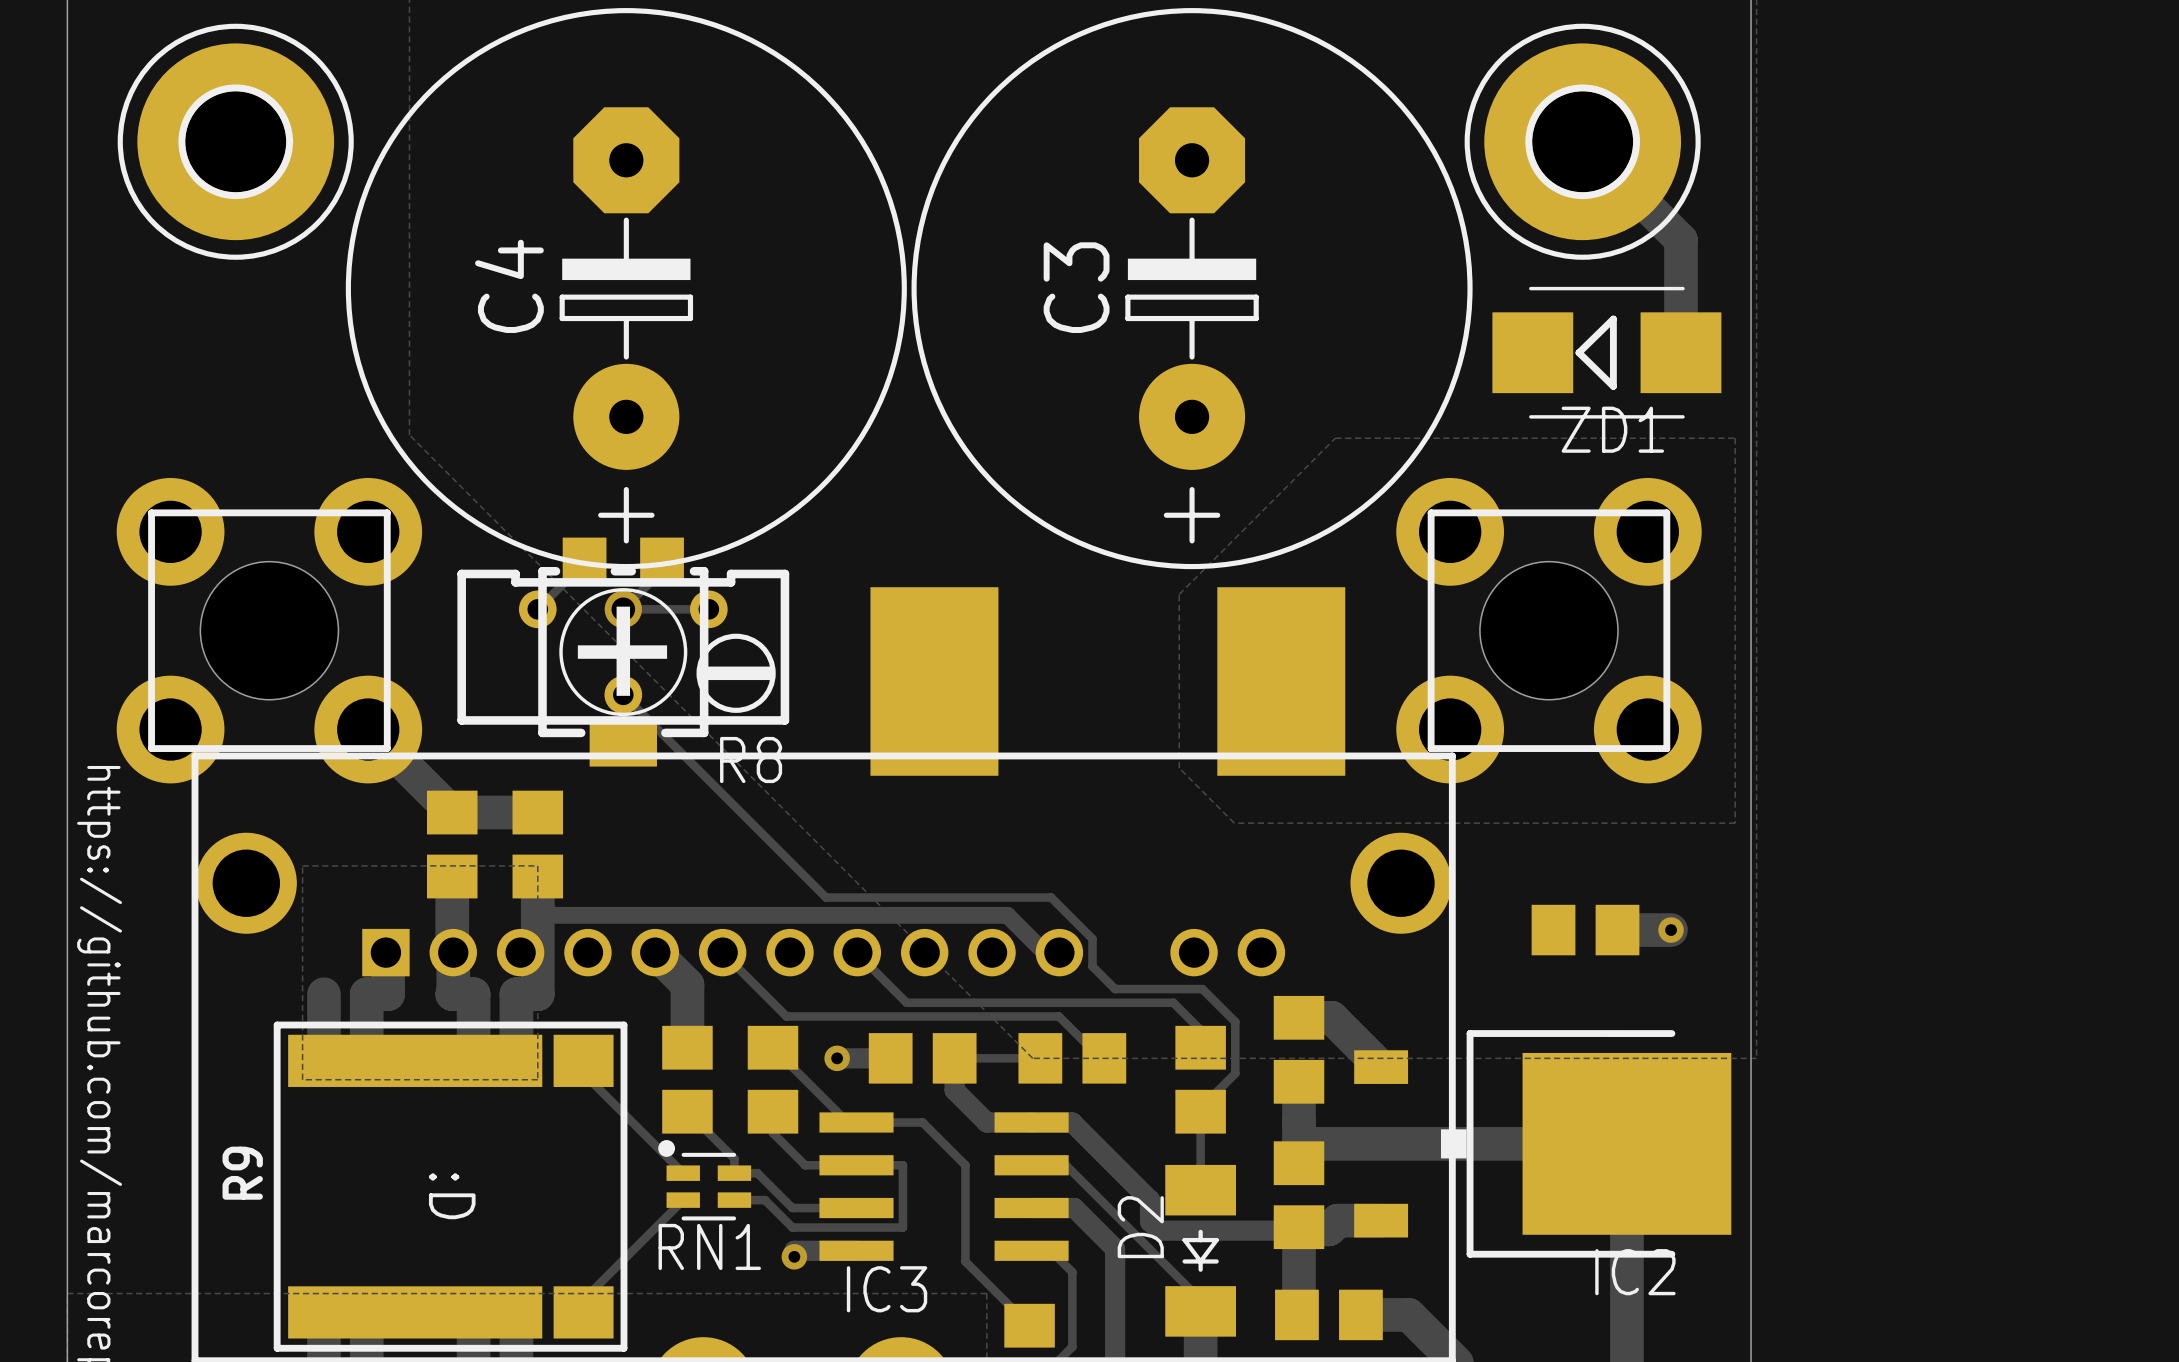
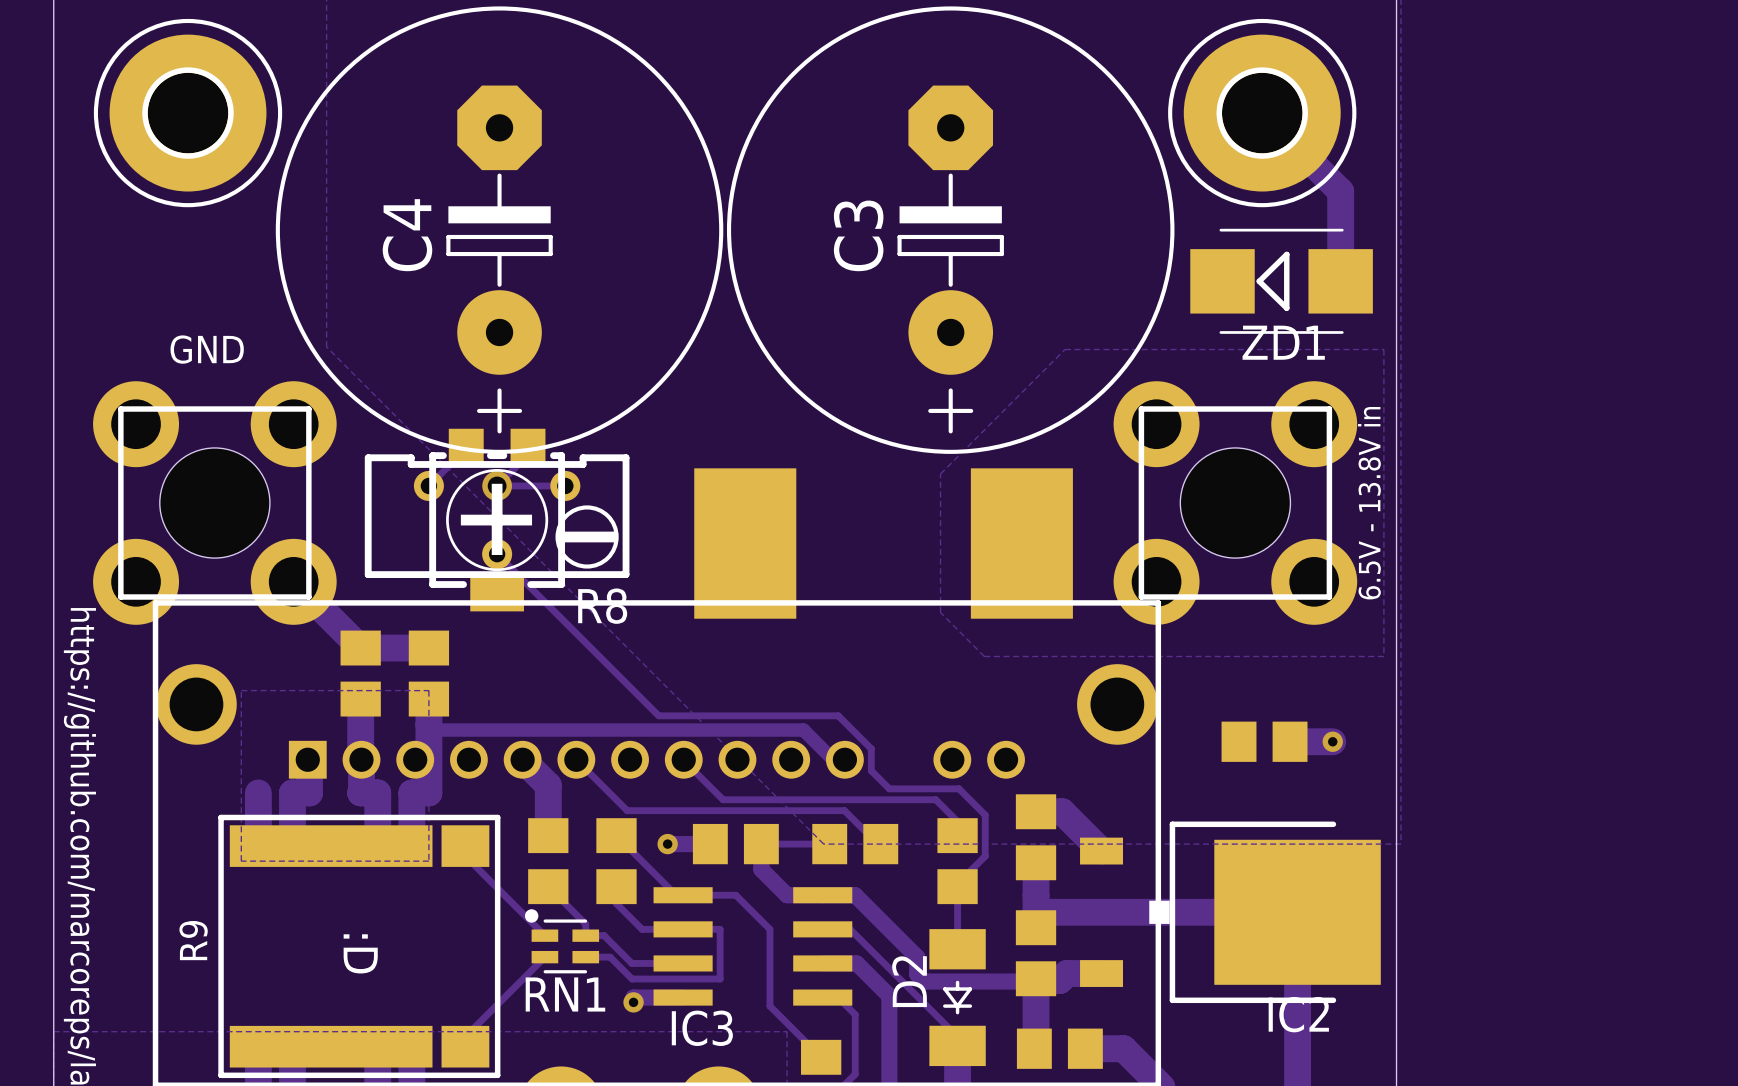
text: none -> GND (207, 349)
text: none -> 6.5V - 13.8V in (1369, 503)

